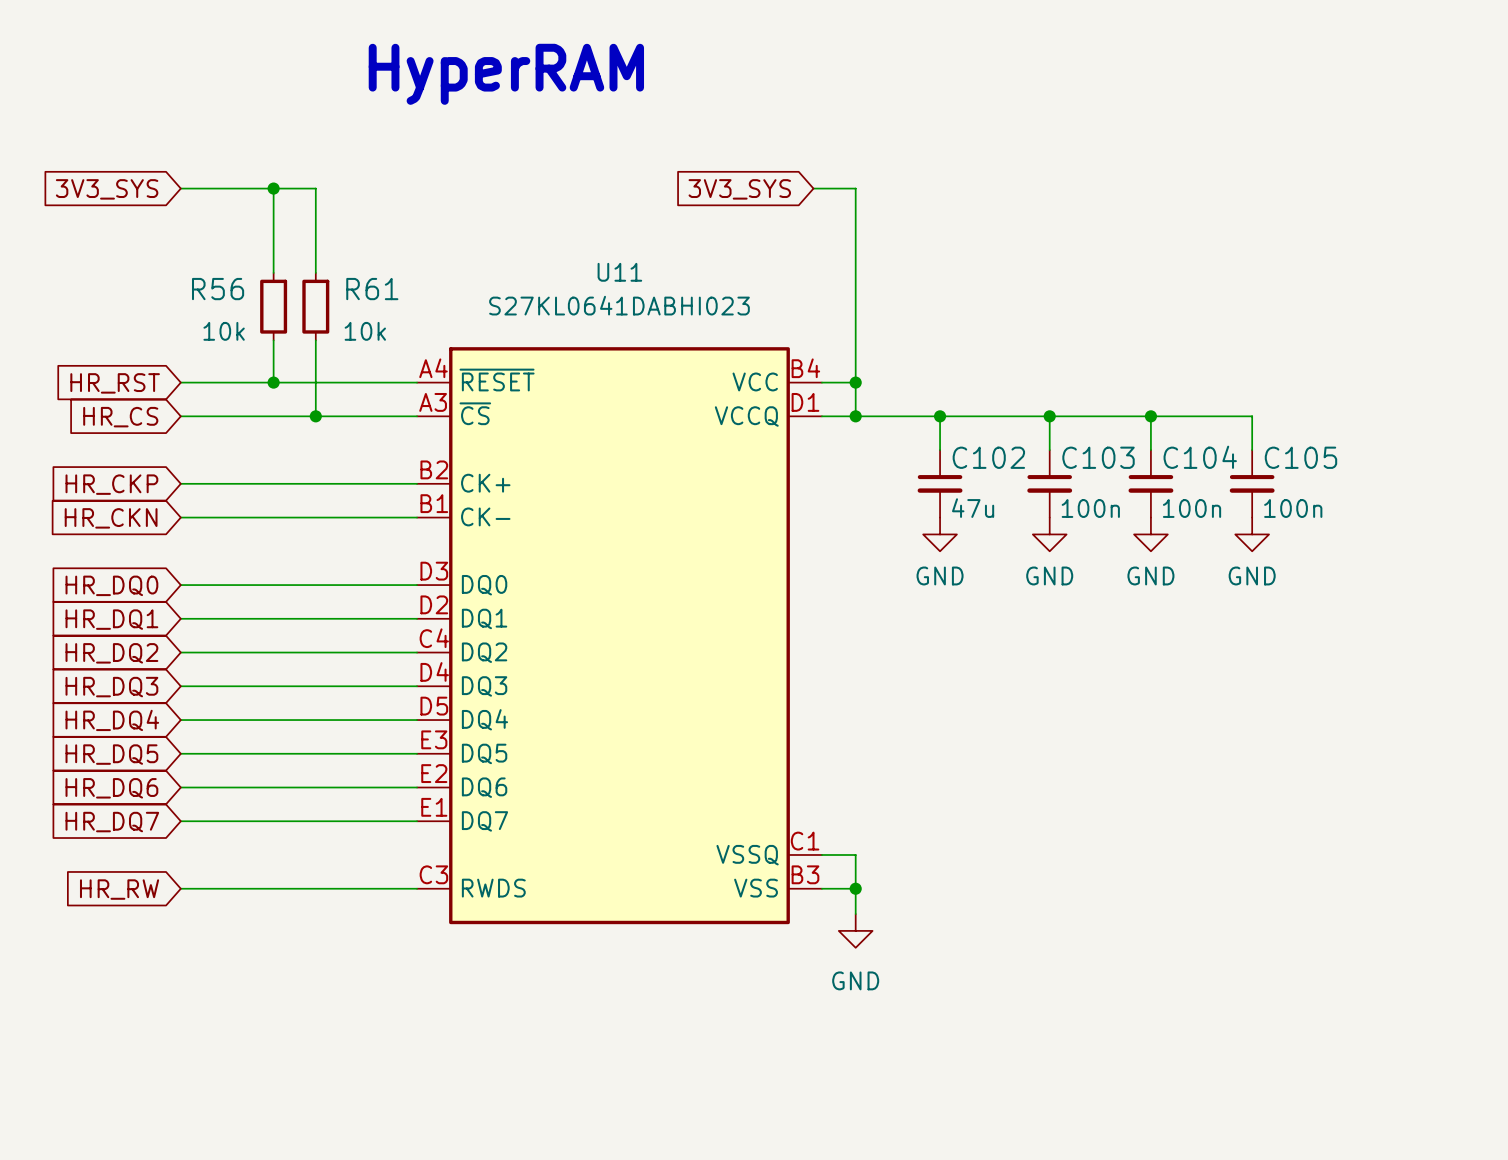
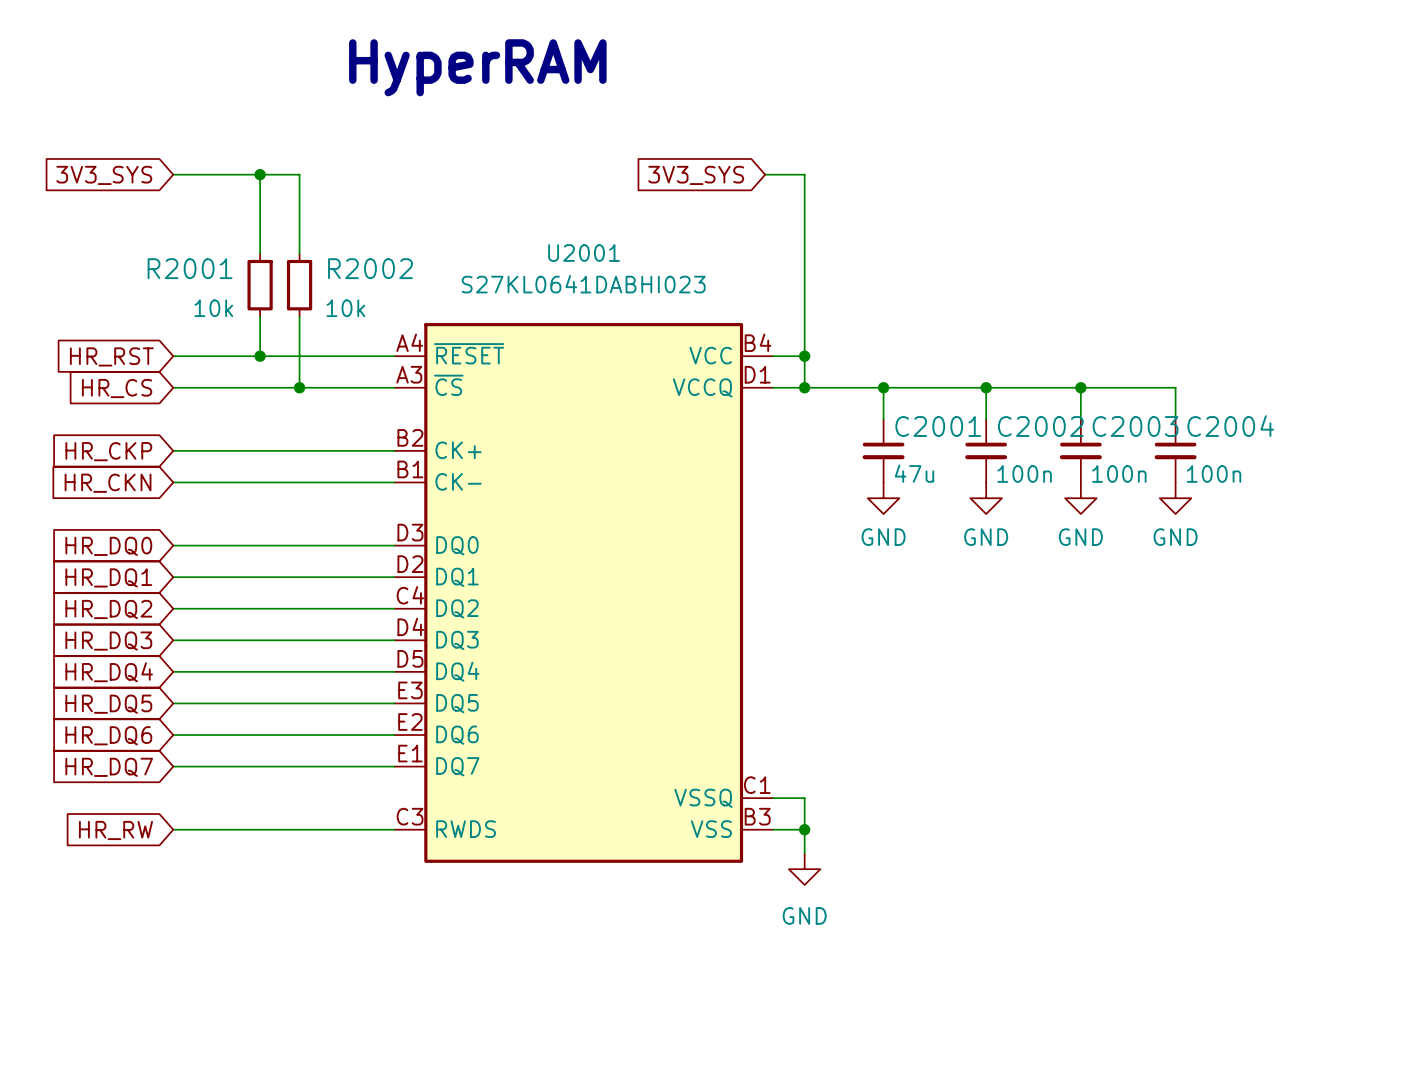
U11 name: U11 (619, 272) -> U2001 (584, 253)
R56 name: R56 (218, 289) -> R2001 (190, 268)
R61 name: R61 (372, 289) -> R2002 (370, 268)
C102 name: C102 (988, 457) -> C2001 (938, 426)
C103 name: C103 (1098, 457) -> C2002 (1040, 426)
C104 name: C104 (1200, 457) -> C2003 (1135, 426)
C105 name: C105 (1300, 457) -> C2004 (1230, 426)

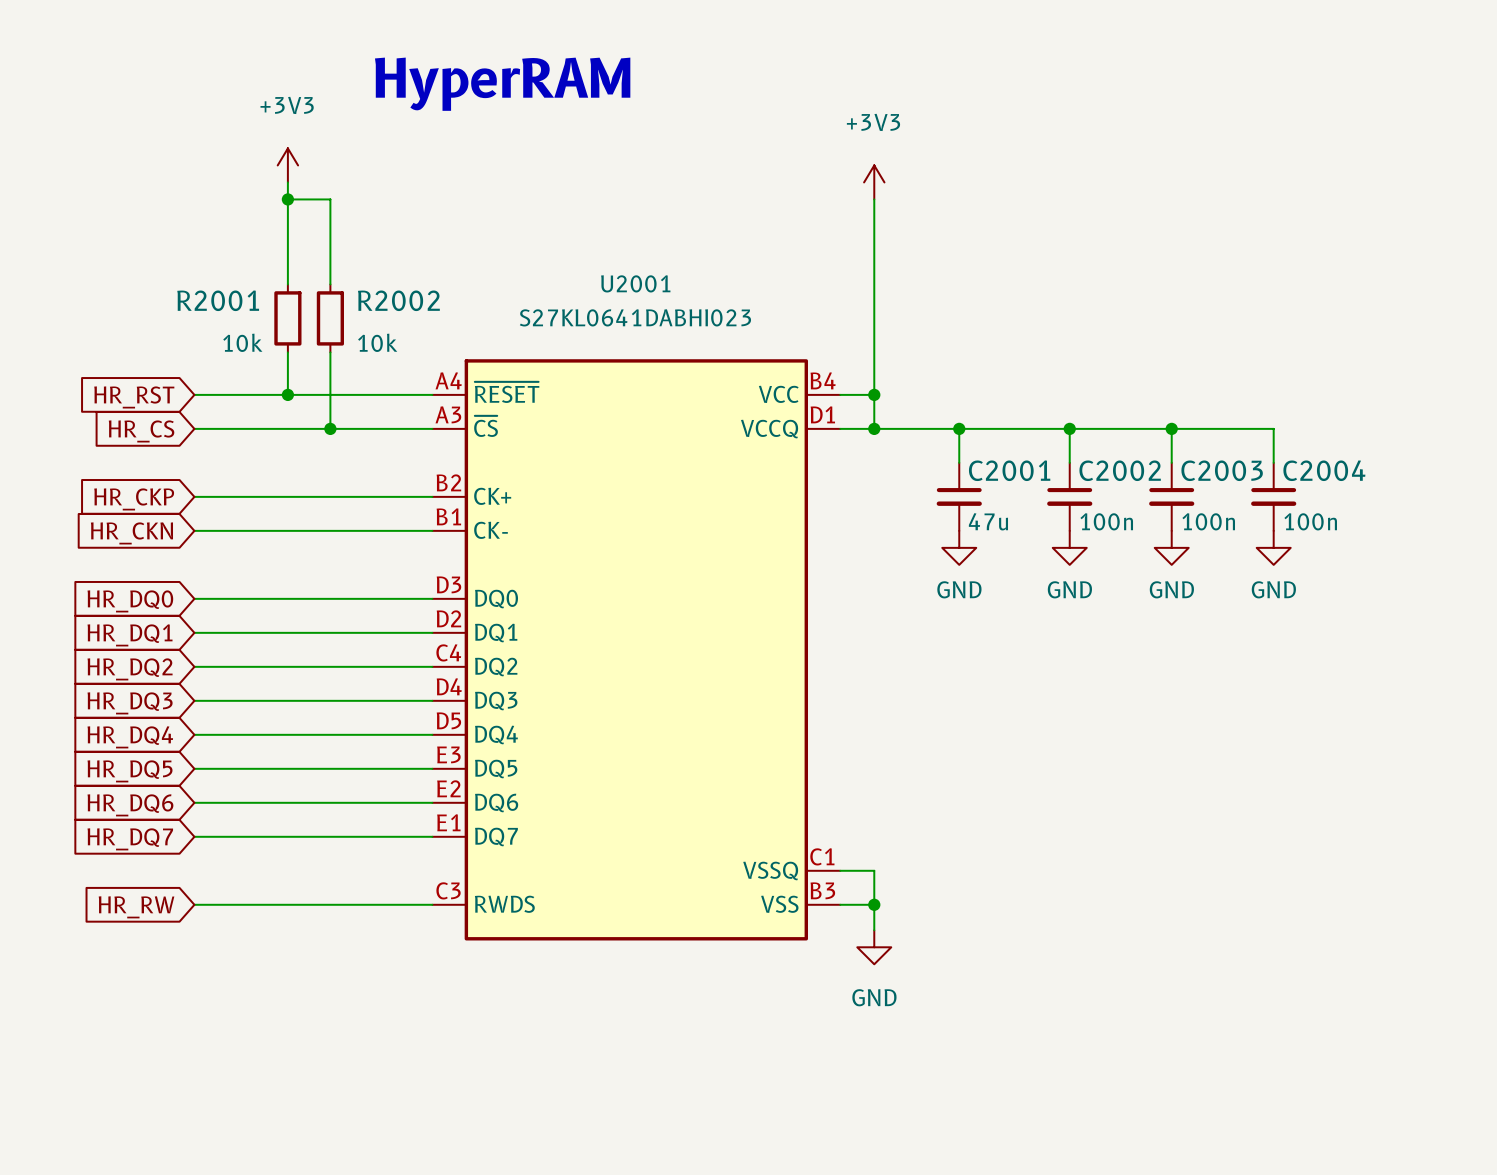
power symbol: none -> +3V3 (287, 165)
power symbol: none -> +3V3 (874, 182)
wire: (173, 174) (260, 174) -> (287, 182) (287, 199)
wire: (765, 174) (804, 174) -> none
global label: 3V3_SYS (104, 175) -> none
global label: 3V3_SYS (696, 175) -> none

